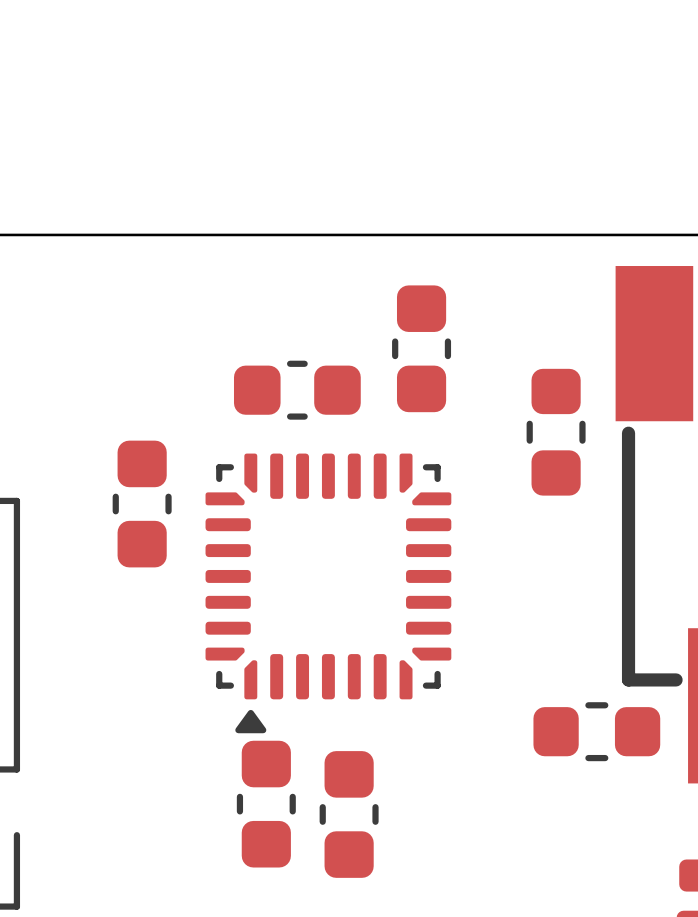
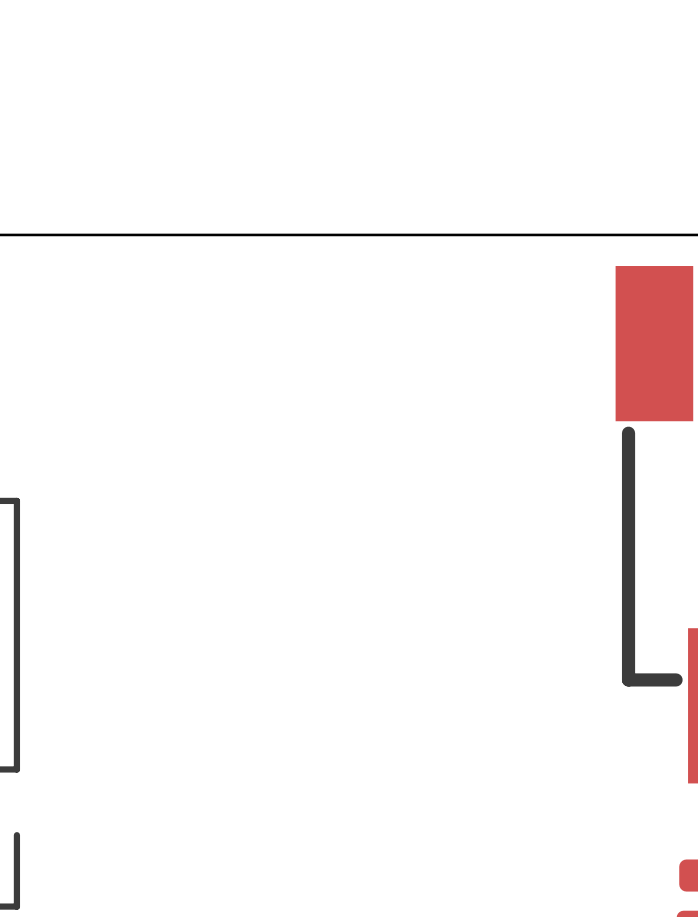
part: (421, 348) -> none
part: (297, 390) -> none
part: (556, 432) -> none
part: (142, 504) -> none
part: (328, 593) -> none
part: (596, 731) -> none
part: (266, 804) -> none
part: (349, 814) -> none

